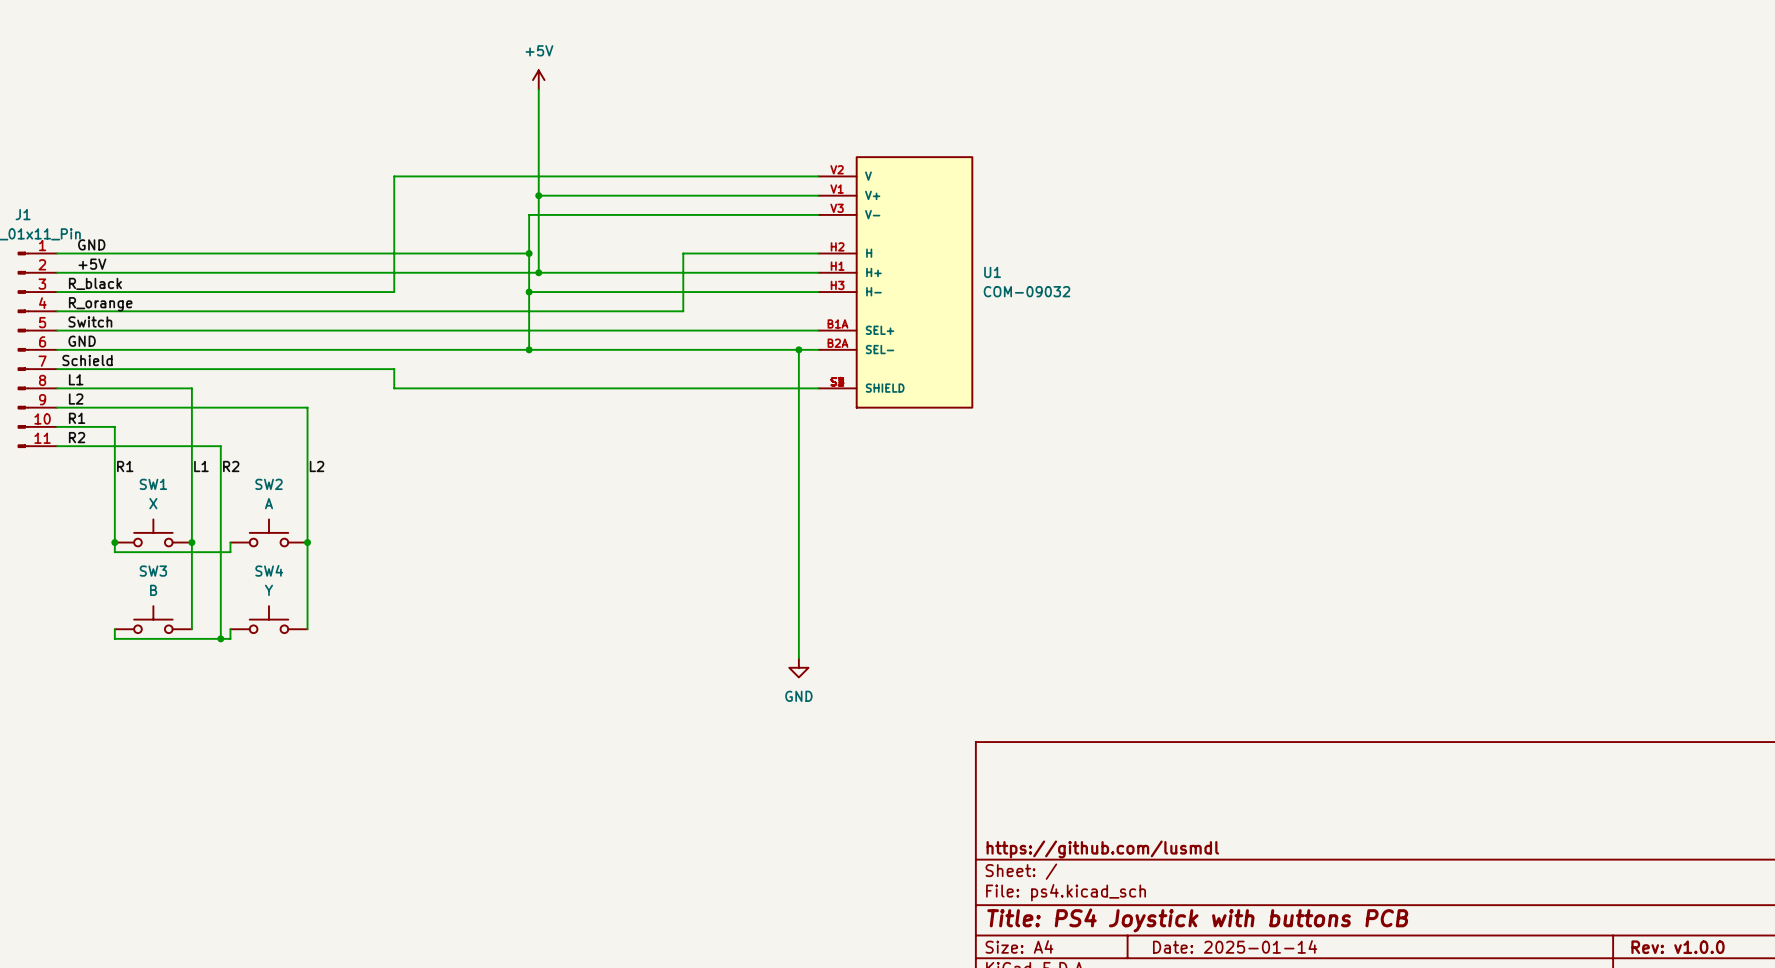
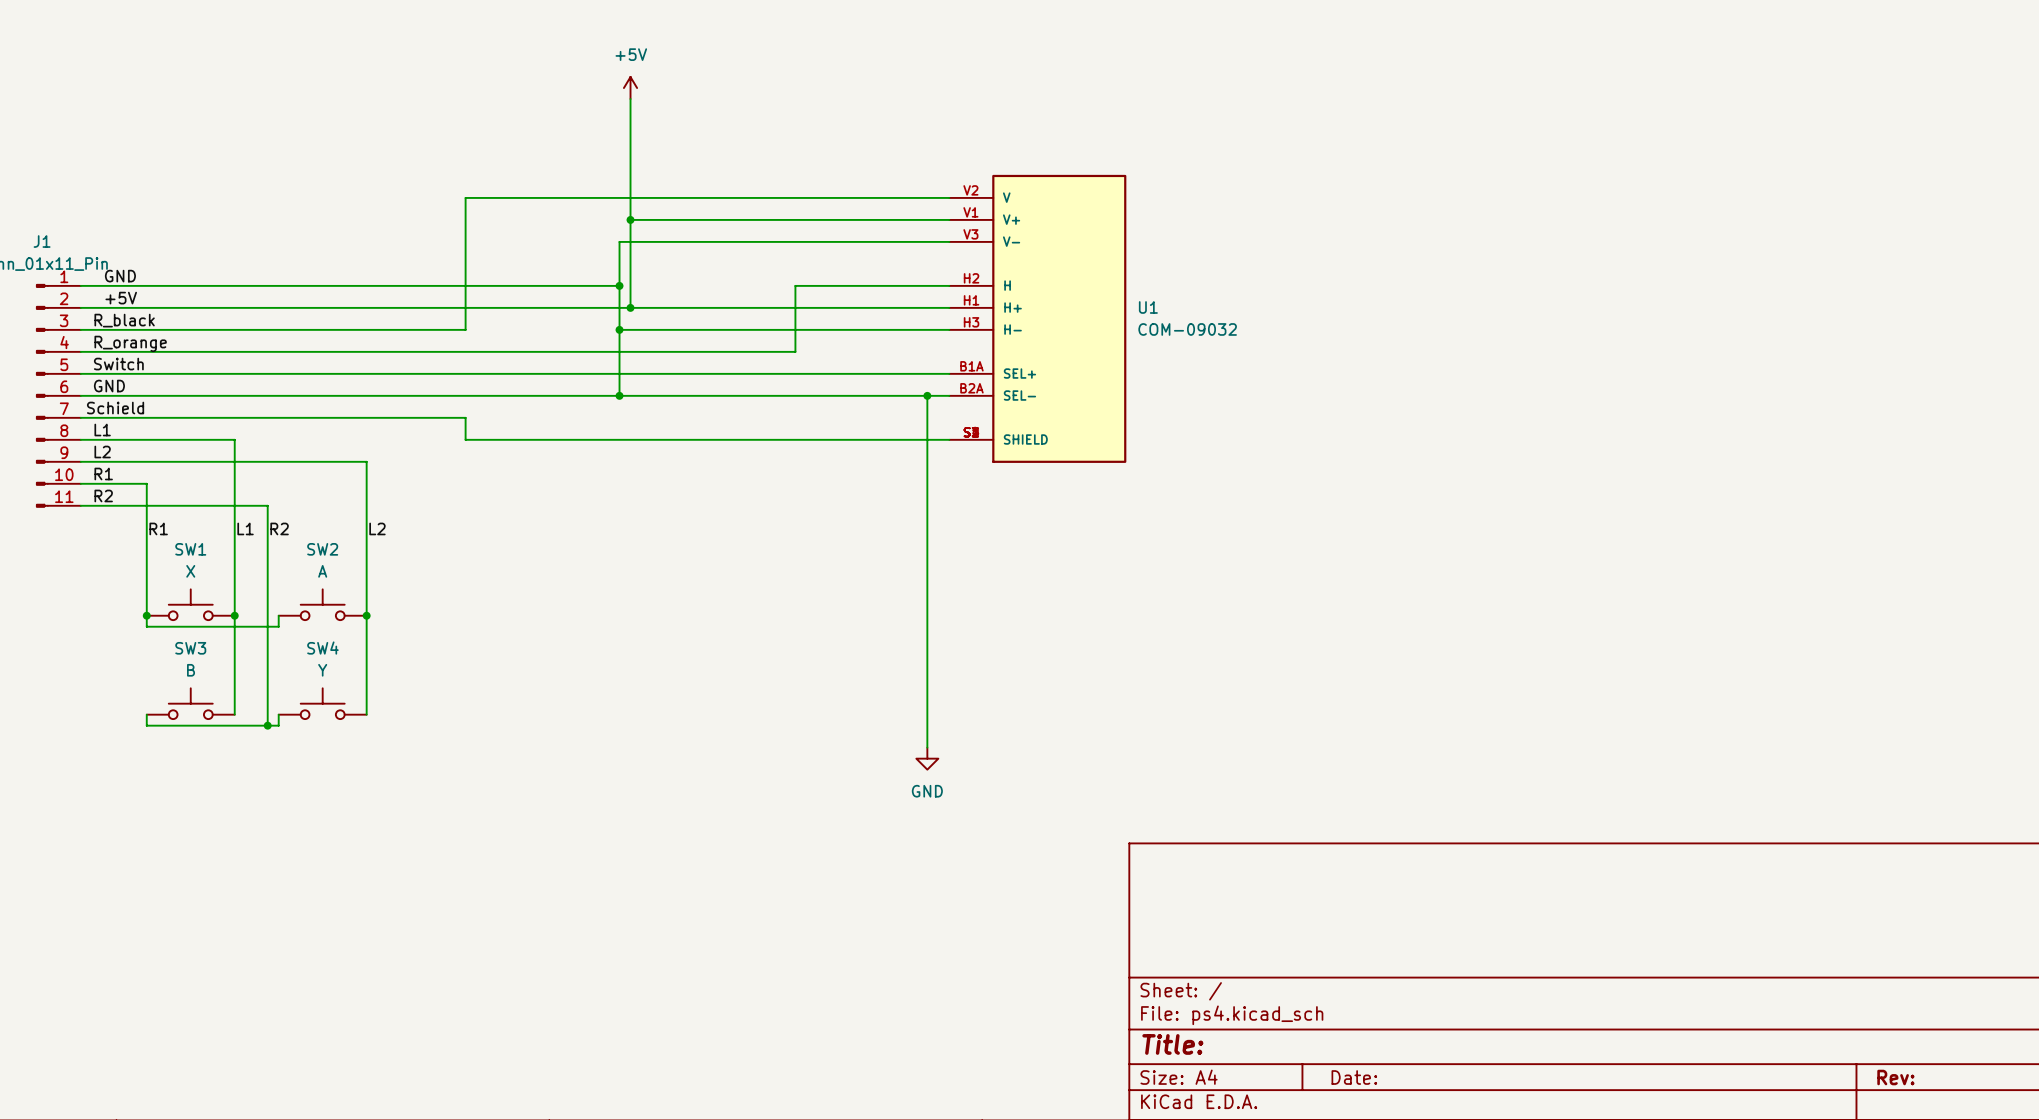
title block: https://github.com/lusmdl (1102, 849) -> none
title block: Title: PS4 Joystick with buttons PCB (1197, 920) -> Title: (1172, 1044)
title block: Date: 2025-01-14 (1235, 946) -> Date: (1354, 1077)
title block: Rev: v1.0.0 (1678, 947) -> Rev: (1895, 1077)

